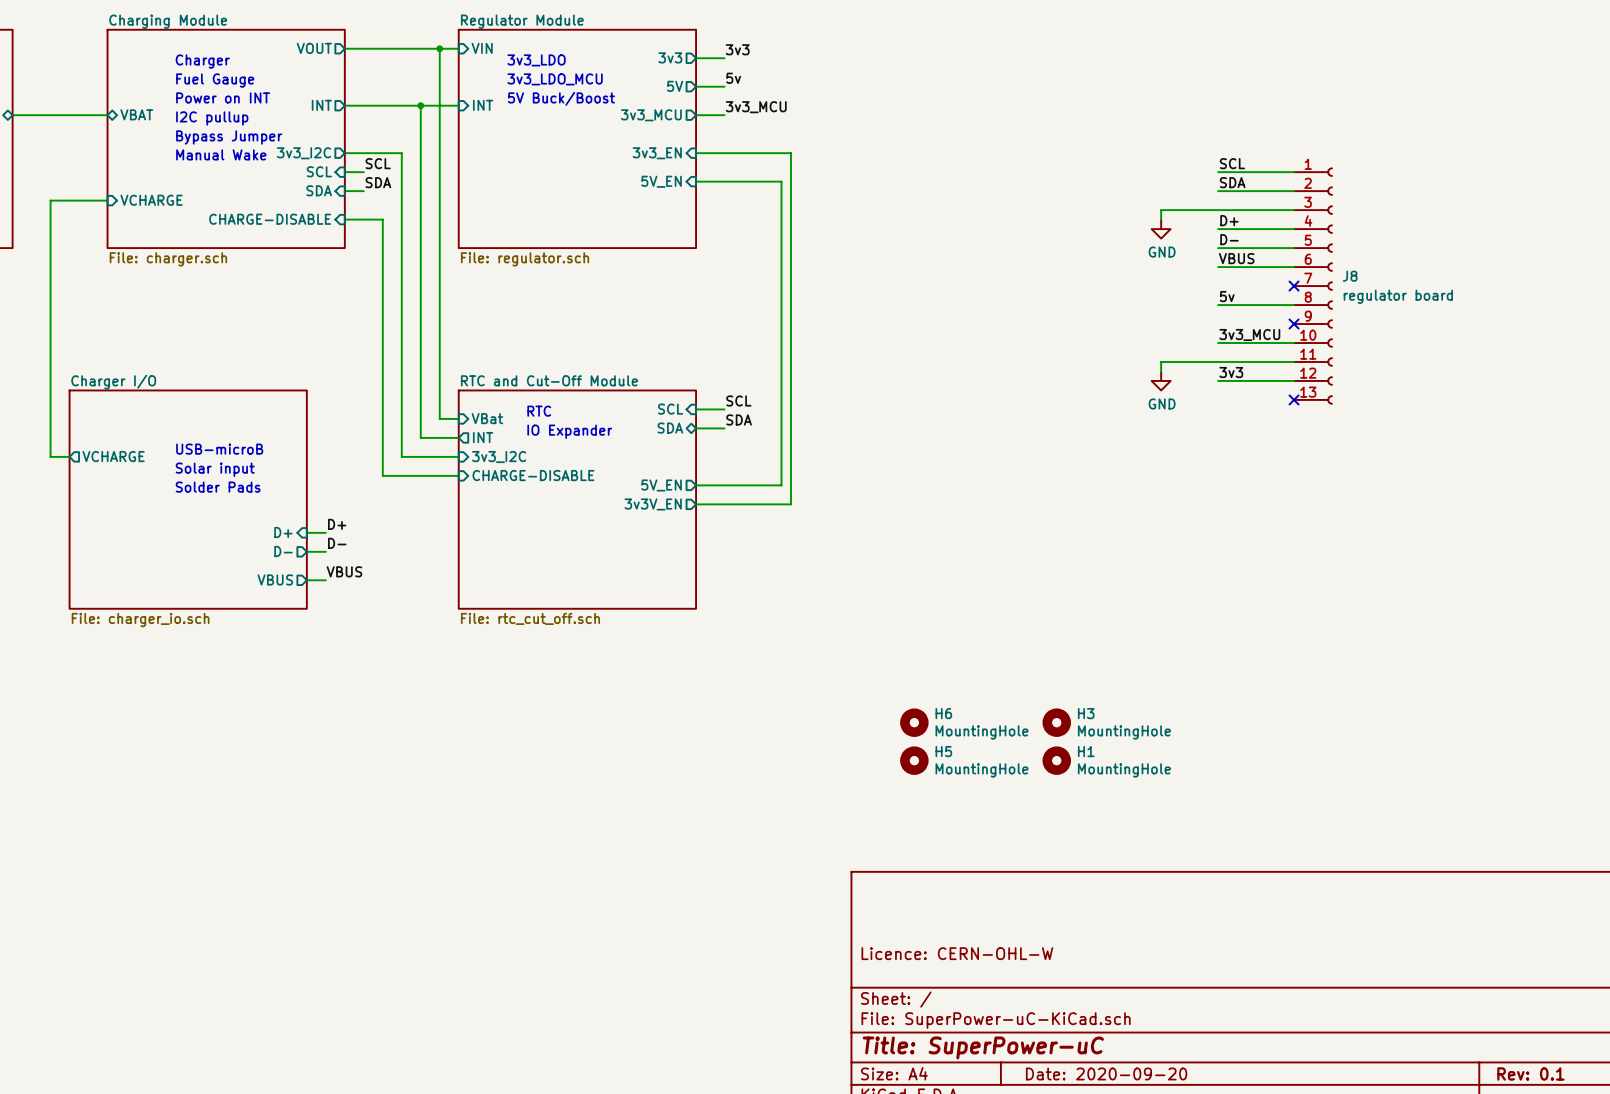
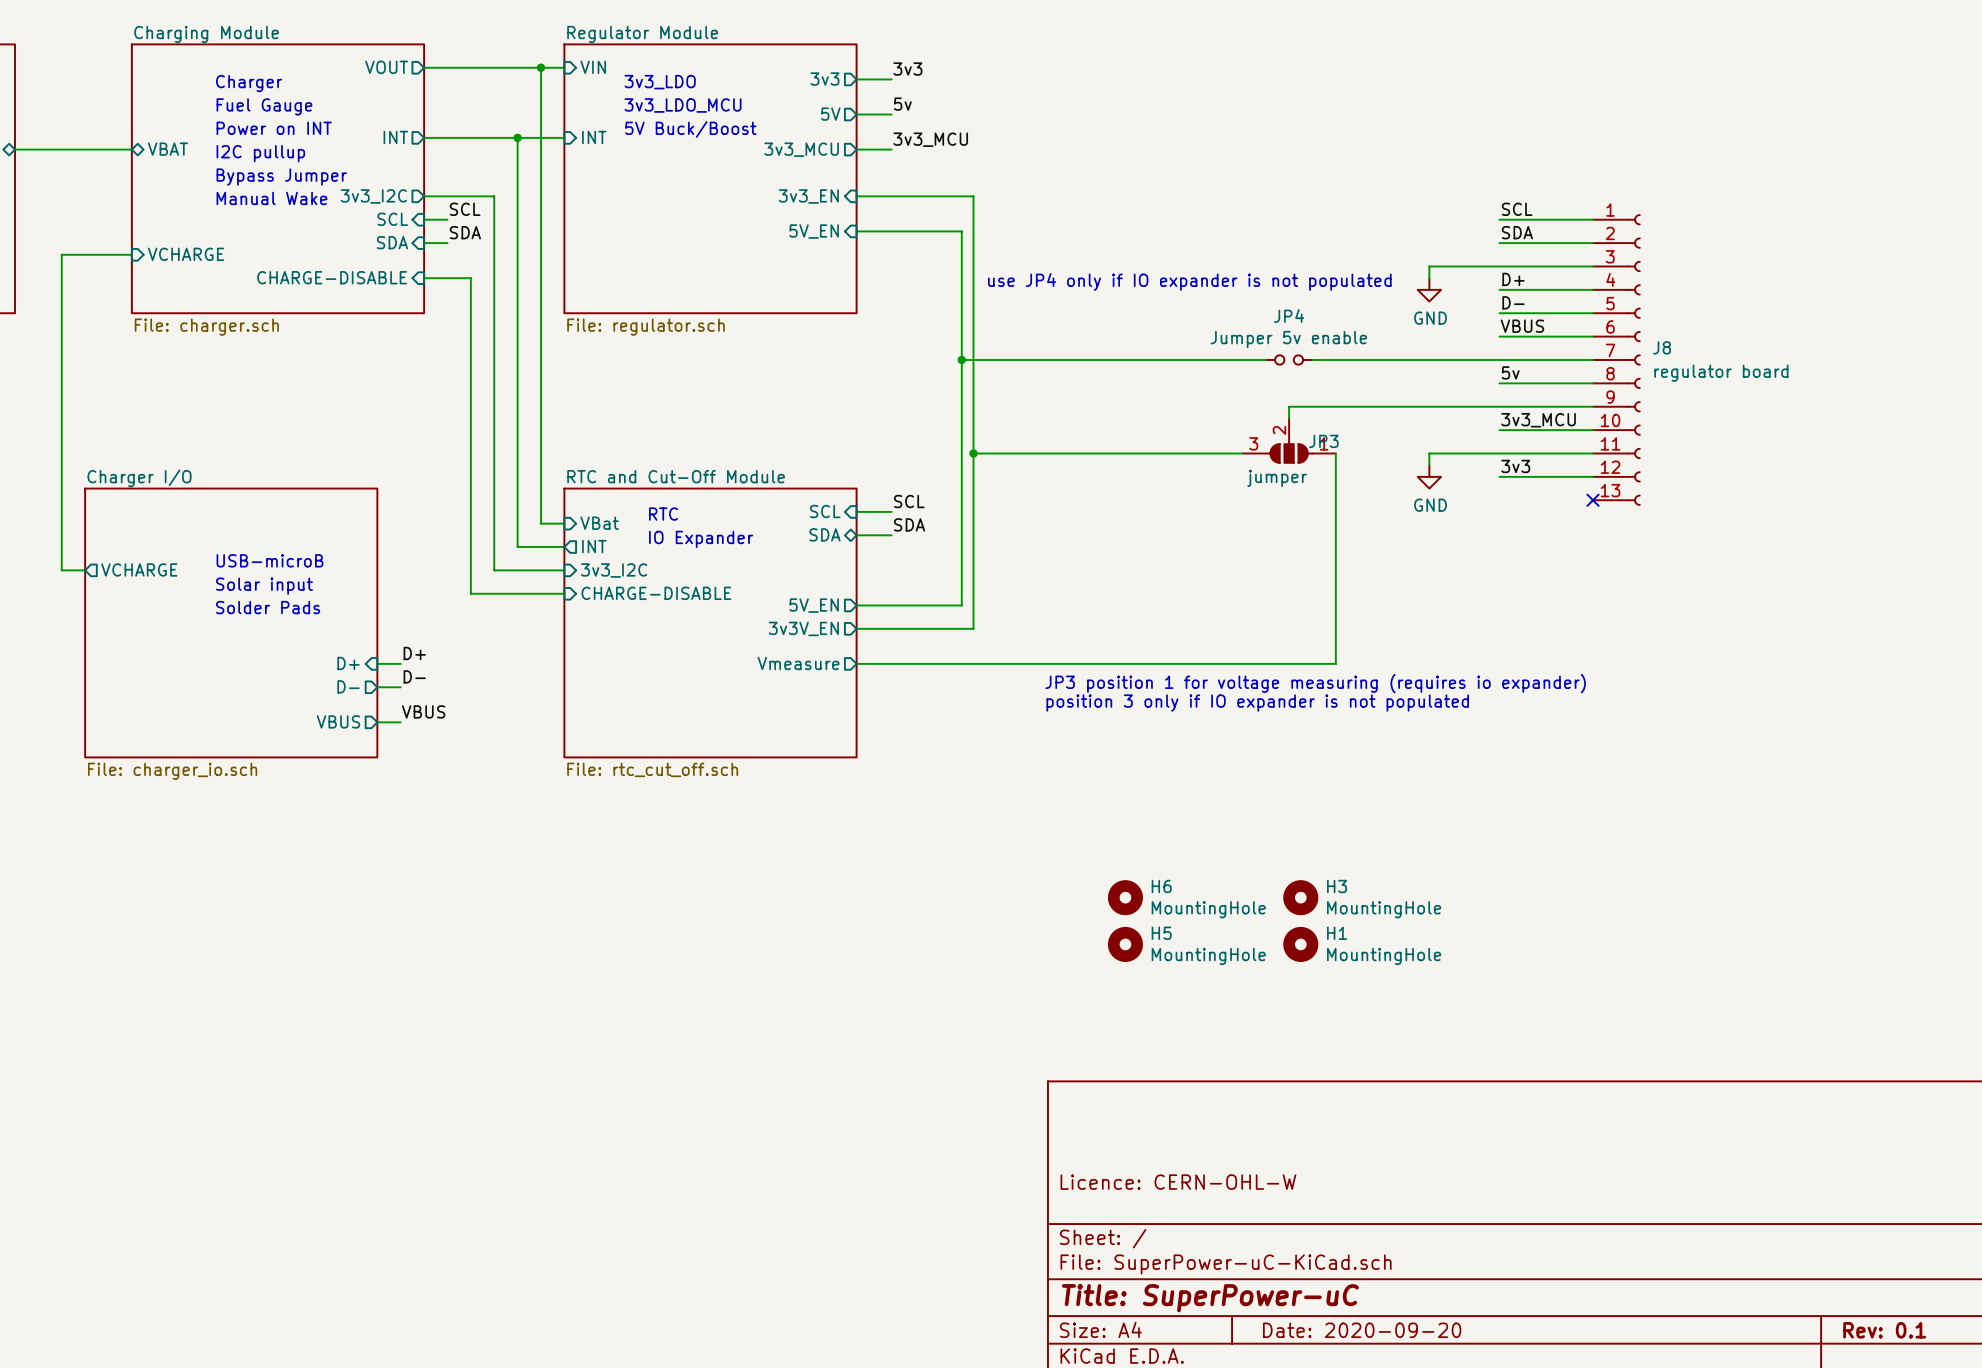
text: none -> use JP4 only if IO expander is not populated (1189, 281)
wire: none -> (961, 359) (1265, 359)
junction: none -> (961, 359)
JP4: none -> Jumper 5v enable (1289, 359)
wire: none -> (1312, 359) (1593, 359)
no-connect mark: (1294, 286) -> none
wire: none -> (1593, 406) (1289, 406) (1289, 418)
no-connect mark: (1294, 324) -> none
JP3: none -> jumper (1289, 440)
wire: none -> (973, 453) (1242, 453)
junction: none -> (973, 453)
wire: none -> (1335, 453) (1335, 663) (856, 663)
sheet pin: none -> Vmeasure (798, 663)
text: none -> JP3 position 1 for voltage measuring (requires io expander) (1315, 683)
text: none -> position 3 only if IO expander is not populated (1257, 703)

